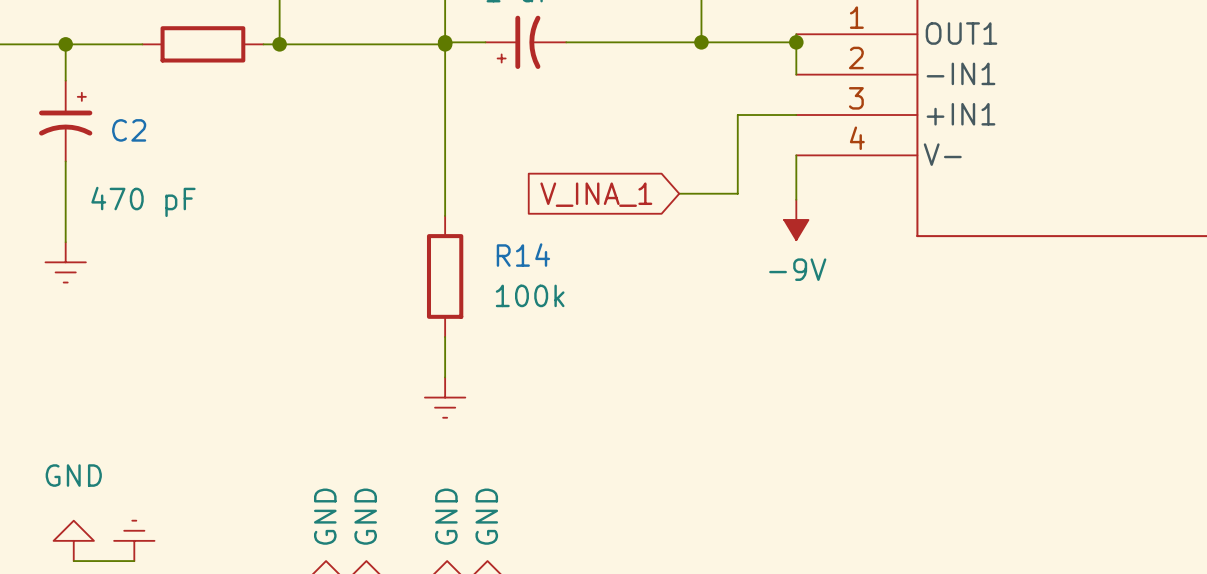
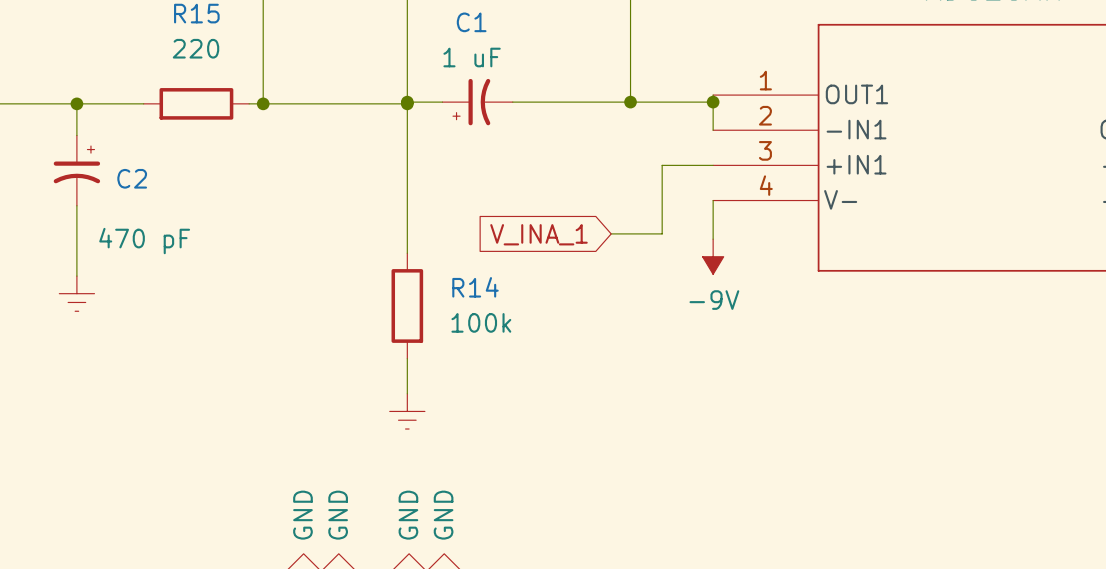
power symbol: GND (73, 540) -> none
power symbol: (134, 540) -> none
wire: (73, 561) (134, 561) -> none

